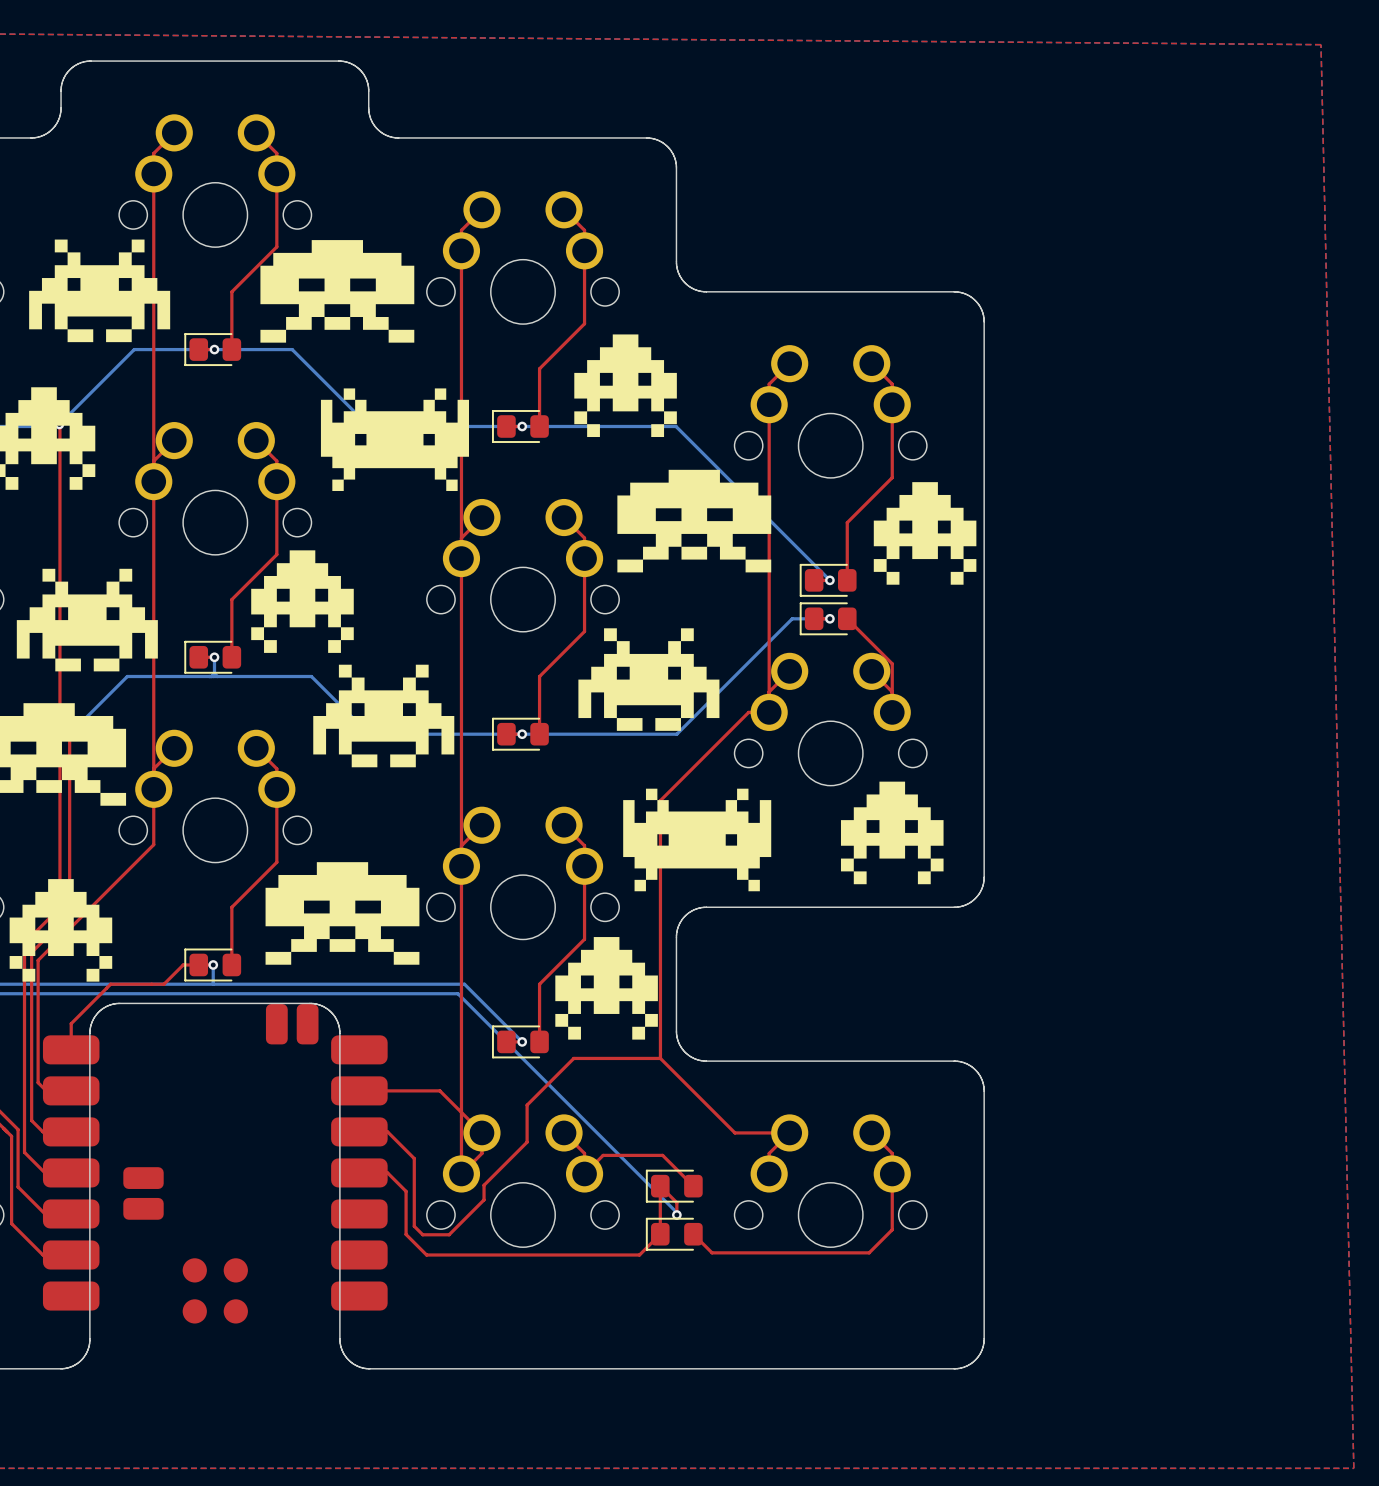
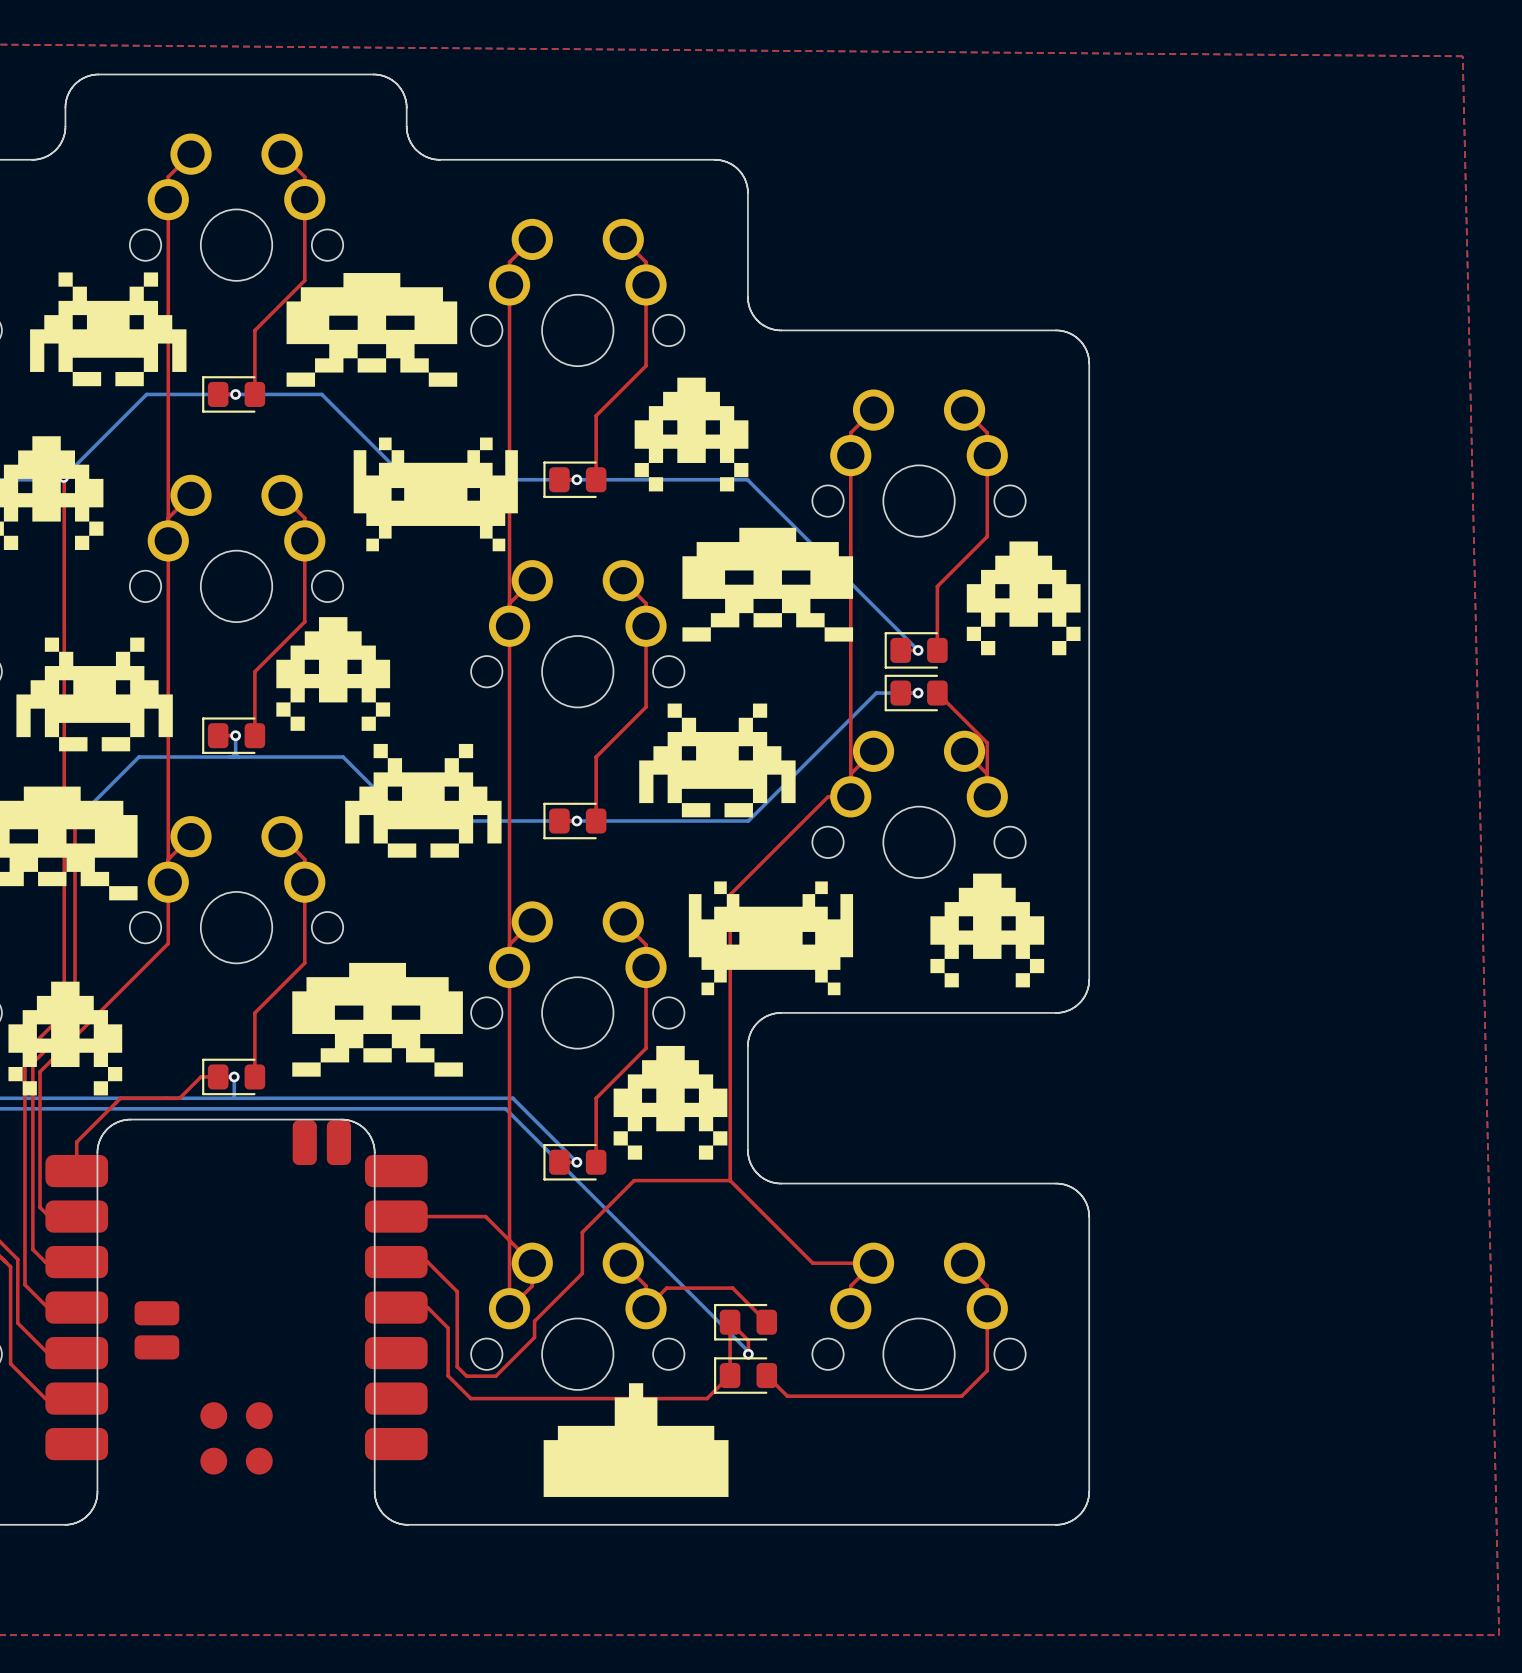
drawing: none -> [543, 1383, 729, 1497]

